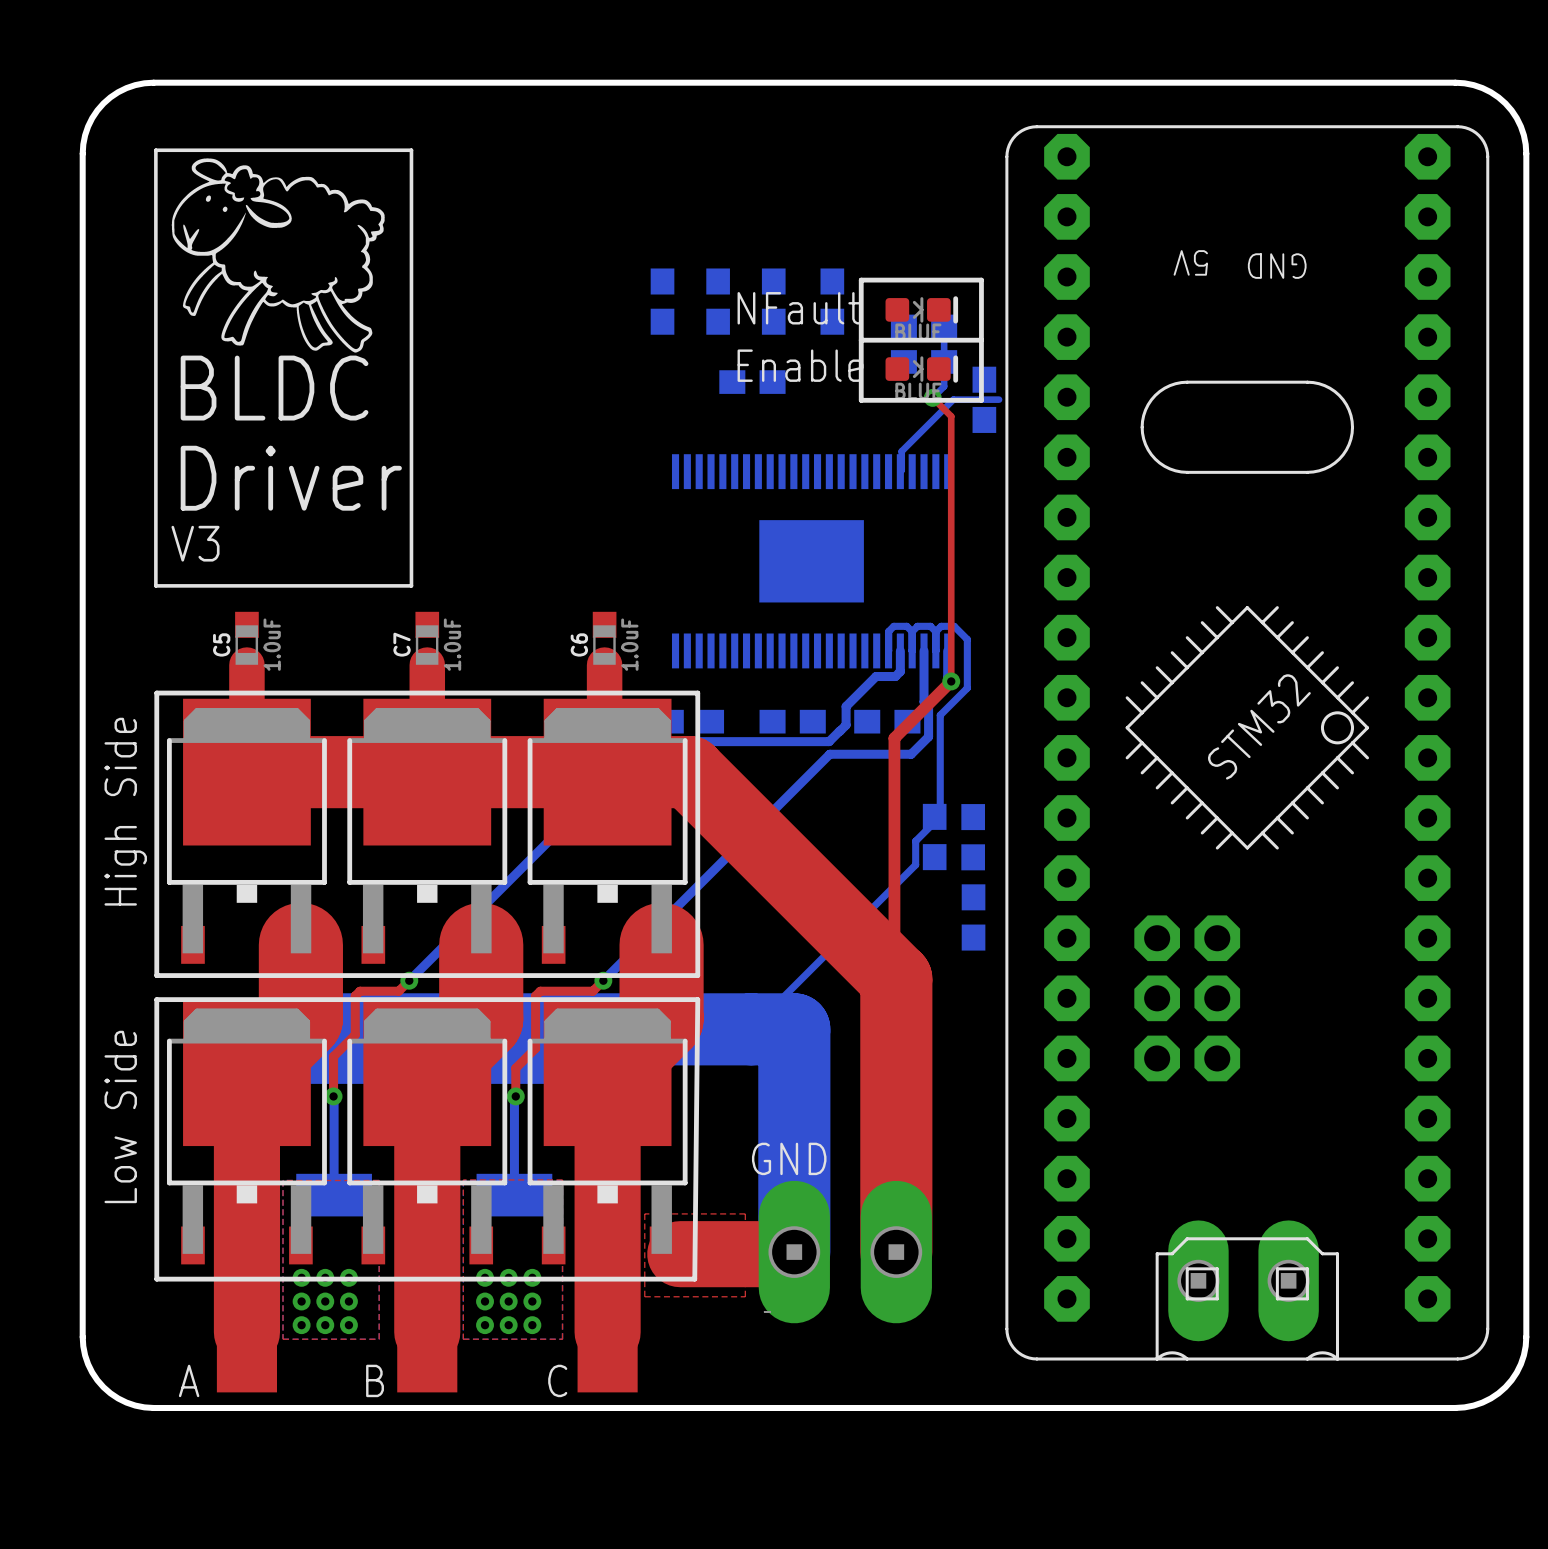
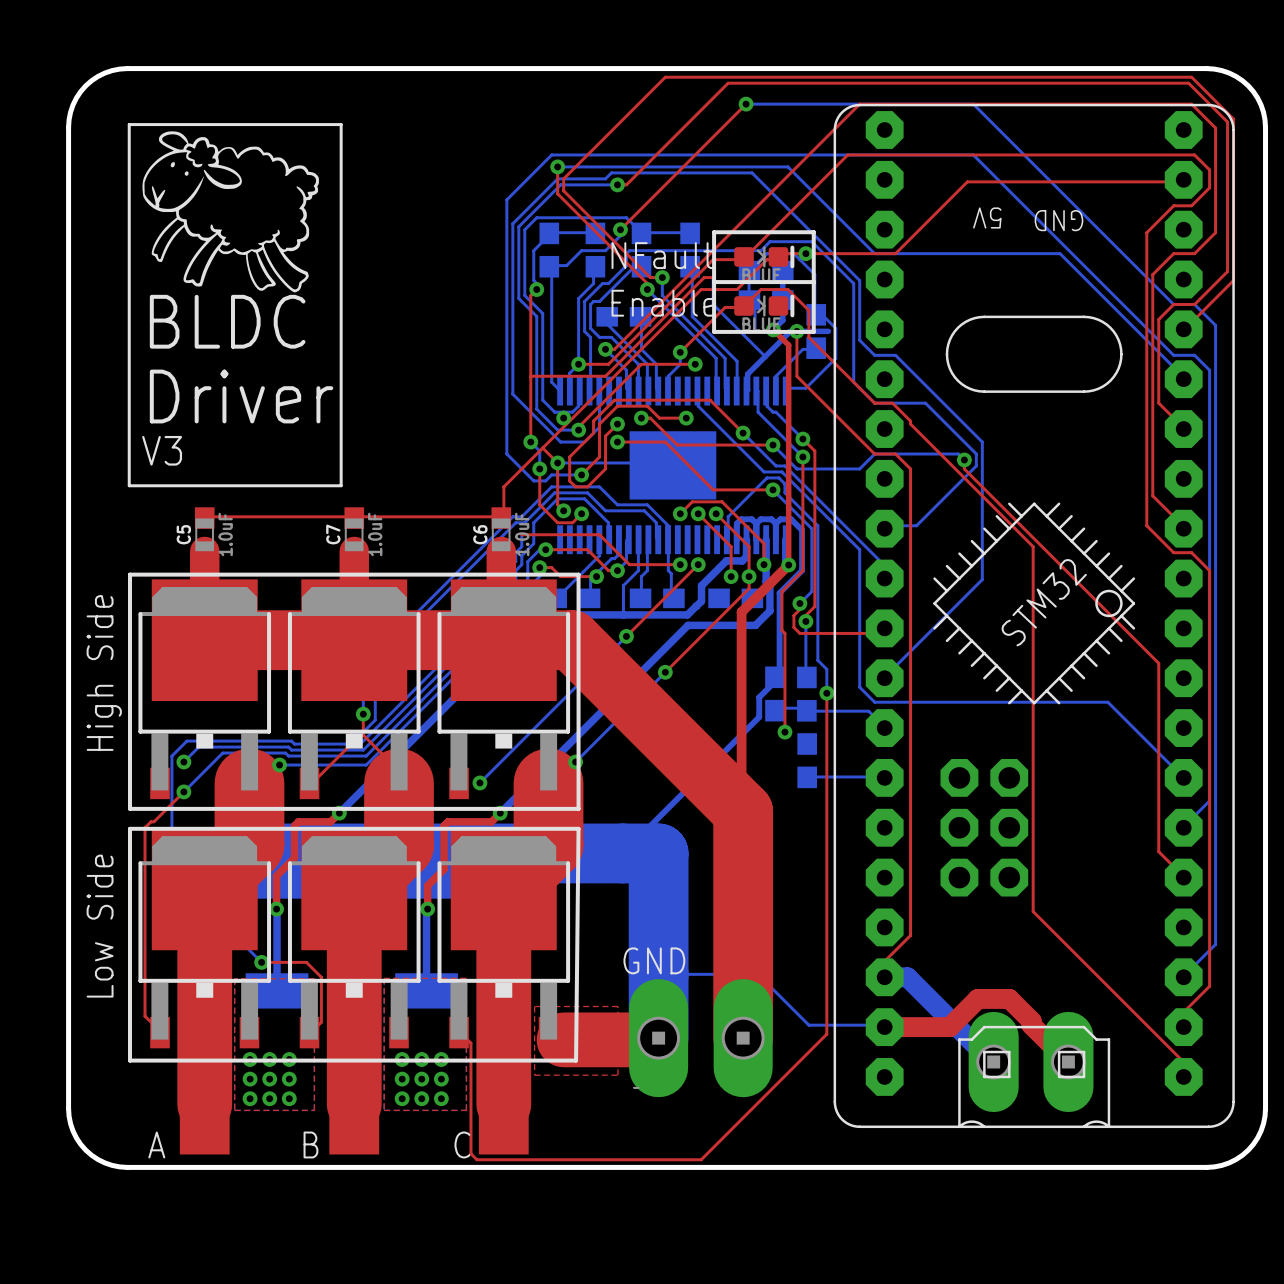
bottom track: none -> (746, 104) (973, 104) (1173, 304) (1194, 304) (1215, 325) (1215, 944) (1183, 977)
top track: none -> (746, 104) (620, 229)
via: none -> (746, 104)
bottom track: none -> (557, 166) (787, 166) (874, 253) (1060, 253) (1183, 379)
top track: none -> (557, 166) (557, 193) (647, 283) (647, 289)
via: none -> (557, 166)
top track: none -> (1183, 179) (1182, 181) (967, 181) (895, 253) (781, 253) (775, 259) (767, 259) (737, 289) (701, 289) (503, 486) (503, 516) (501, 518) (204, 518)
bottom track: none -> (617, 184) (560, 184) (518, 226) (518, 298) (536, 316) (536, 409) (557, 430) (578, 430)
top track: none -> (617, 184) (626, 184) (728, 83) (1188, 83) (1227, 122) (1227, 271) (1194, 304) (1173, 304) (1158, 319) (1158, 403) (1183, 429)
via: none -> (617, 184)
bottom track: none -> (620, 229) (620, 235) (605, 250) (581, 250) (566, 265) (549, 266) (551, 268) (551, 382) (560, 391)
via: none -> (620, 229)
bottom track: none -> (595, 233) (549, 233) (533, 250) (533, 280) (536, 283) (536, 289)
bottom track: none -> (690, 233) (641, 233) (626, 217) (536, 217) (524, 229) (524, 295) (542, 313) (542, 400) (554, 412) (572, 412) (578, 406) (579, 391)
via: none -> (805, 253)
bottom track: none -> (595, 266) (593, 268) (593, 283) (578, 298) (578, 364) (569, 373) (569, 391)
bottom track: none -> (641, 266) (641, 268) (632, 268) (599, 301) (593, 301) (590, 304) (590, 328) (599, 337) (611, 337) (638, 364) (638, 391)
bottom track: none -> (690, 266) (692, 268) (692, 316) (737, 361) (736, 391)
bottom track: none -> (662, 277) (662, 295) (725, 358) (725, 388) (726, 391)
top track: none -> (662, 277) (650, 277) (563, 190) (563, 178) (665, 77) (1191, 77) (1233, 119) (1233, 280) (1183, 329)
via: none -> (662, 277)
bottom track: none -> (713, 277) (713, 304) (765, 356)
top track: none -> (713, 277) (704, 277) (605, 376) (530, 376)
top track: none -> (536, 289) (530, 295) (530, 442)
via: none -> (536, 289)
bottom track: none -> (647, 289) (716, 358) (717, 391)
via: none -> (647, 289)
bottom track: none -> (607, 316) (608, 325) (647, 364) (648, 391)
bottom track: none -> (640, 316) (641, 349) (656, 364) (656, 388) (658, 391)
bottom track: none -> (755, 328) (755, 304) (749, 298) (749, 270) (767, 253) (793, 253) (814, 274) (814, 313) (817, 316) (823, 316) (835, 328) (835, 358) (805, 388) (787, 388) (785, 391)
top track: none -> (796, 331) (796, 376) (874, 454) (895, 454) (910, 468) (910, 935) (886, 959) (886, 974) (884, 977)
via: none -> (796, 331)
bottom track: none -> (816, 348) (802, 349) (775, 376) (775, 391)
bottom track: none -> (605, 349) (626, 370) (626, 388) (628, 391)
top track: none -> (605, 349) (614, 349) (859, 104) (1191, 104) (1215, 128) (1215, 232) (1194, 253) (1173, 253) (1152, 274) (1152, 495) (1183, 528)
via: none -> (605, 349)
bottom track: none -> (680, 352) (680, 364) (668, 376) (668, 391)
top track: none -> (680, 352) (725, 307) (743, 307) (761, 289) (787, 289) (808, 310) (808, 337) (874, 403) (892, 403) (910, 421) (910, 424) (1033, 546) (1033, 911) (1182, 1061) (1183, 1076)
via: none -> (680, 352)
top track: none -> (578, 364) (608, 364) (713, 259) (743, 259) (847, 154) (1194, 154) (1209, 169) (1209, 187) (1191, 205) (1173, 205) (1146, 232) (1146, 525) (1173, 552) (1191, 552) (1209, 570) (1209, 986) (1185, 1010) (1185, 1025) (1183, 1027)
via: none -> (578, 364)
top track: none -> (695, 364) (641, 364) (578, 427) (578, 430)
via: none -> (695, 364)
bottom track: none -> (589, 391) (590, 337) (584, 331) (584, 301) (602, 283) (608, 283) (626, 265) (626, 253) (629, 250) (761, 250) (770, 241) (811, 241) (853, 283) (853, 382) (874, 403) (925, 403) (976, 454) (976, 465) (916, 525) (886, 525) (884, 528)
bottom track: none -> (599, 391) (599, 427) (584, 442) (560, 442) (512, 394) (512, 223) (557, 178) (605, 178) (611, 172) (752, 172) (859, 280) (859, 340) (874, 355) (895, 355) (982, 442) (982, 579) (884, 678)
bottom track: none -> (697, 391) (698, 406) (764, 471) (781, 471) (859, 549) (859, 687) (874, 702) (1107, 702) (1183, 777)
bottom track: none -> (756, 391) (758, 391) (758, 412) (802, 457)
bottom track: none -> (766, 391) (767, 406) (772, 412) (775, 412) (802, 439)
via: none -> (563, 418)
top track: none -> (641, 418) (650, 418) (677, 445) (772, 445)
via: none -> (641, 418)
top track: none -> (686, 418) (659, 418) (647, 406) (617, 406) (599, 424) (599, 457) (581, 474)
via: none -> (686, 418)
top track: none -> (617, 424) (605, 436) (605, 468) (587, 486) (575, 486) (569, 480) (569, 457) (593, 433) (593, 421) (614, 400) (710, 400) (743, 433)
via: none -> (617, 424)
via: none -> (578, 430)
bottom track: none -> (743, 433) (775, 465) (784, 465) (883, 564) (884, 578)
via: none -> (743, 433)
top track: none -> (802, 439) (814, 451) (814, 606) (805, 615) (805, 621)
via: none -> (802, 439)
bottom track: none -> (530, 442) (539, 451) (539, 468)
via: none -> (530, 442)
top track: none -> (617, 442) (665, 442) (713, 489) (772, 489)
via: none -> (617, 442)
bottom track: none -> (772, 445) (796, 468) (859, 468) (874, 454) (958, 454) (964, 459)
via: none -> (772, 445)
top track: none -> (542, 448) (557, 462) (557, 504) (563, 510)
top track: none -> (802, 457) (802, 570) (781, 591) (781, 630) (784, 633) (784, 732)
via: none -> (802, 457)
top track: none -> (964, 459) (964, 468) (1158, 663) (1158, 851) (1183, 877)
via: none -> (964, 459)
bottom track: none -> (557, 462) (671, 462) (672, 465)
via: none -> (557, 462)
top track: none -> (539, 468) (539, 504) (557, 522) (572, 522) (581, 513)
via: none -> (539, 468)
bottom track: none -> (581, 474) (551, 474) (545, 480) (533, 480) (506, 454) (506, 199) (551, 154) (973, 154) (1173, 355) (1194, 355) (1209, 370) (1209, 800) (1183, 827)
via: none -> (581, 474)
bottom track: none -> (772, 489) (811, 528) (811, 591) (799, 603)
via: none -> (772, 489)
via: none -> (563, 510)
via: none -> (581, 513)
top track: none -> (680, 513) (692, 501) (722, 501) (764, 543) (764, 564)
via: none -> (680, 513)
top track: none -> (698, 513) (731, 546) (731, 576)
via: none -> (698, 513)
top track: none -> (716, 513) (749, 546) (749, 588) (665, 672)
via: none -> (716, 513)
bottom track: none -> (521, 534) (521, 546) (515, 552) (515, 561) (509, 567) (509, 594) (360, 744) (294, 744) (291, 741) (186, 741) (171, 756) (171, 917) (192, 938) (237, 938) (261, 962)
top track: none -> (521, 534) (599, 534) (629, 564) (680, 564)
bottom track: none -> (599, 539) (599, 555) (556, 598)
bottom track: none -> (609, 539) (608, 522) (584, 498) (557, 498) (533, 522) (533, 543) (521, 555) (521, 564) (515, 570) (515, 597) (363, 750) (291, 750) (288, 747) (198, 747) (183, 762)
bottom track: none -> (618, 539) (617, 555) (611, 558) (590, 579) (589, 598)
bottom track: none -> (628, 539) (626, 540) (626, 561) (617, 570)
bottom track: none -> (638, 539) (638, 570) (623, 585) (623, 614)
bottom track: none -> (648, 539) (647, 570) (641, 576) (640, 598)
bottom track: none -> (658, 539) (656, 537) (656, 522) (644, 510) (605, 510) (587, 492) (554, 492) (524, 522) (515, 522) (375, 663) (375, 720) (363, 732) (351, 732)
bottom track: none -> (726, 539) (728, 516) (767, 477) (778, 477) (784, 483) (784, 492) (817, 525) (817, 660) (826, 669) (826, 693)
bottom track: none -> (545, 549) (539, 549) (527, 561) (527, 579) (521, 585) (521, 600) (366, 756) (288, 756) (285, 753) (222, 753) (183, 791)
top track: none -> (545, 549) (587, 549) (608, 570) (617, 570)
via: none -> (545, 549)
via: none -> (680, 564)
top track: none -> (698, 564) (626, 636)
via: none -> (698, 564)
via: none -> (764, 564)
bottom track: none -> (539, 567) (539, 576) (527, 588) (527, 603) (366, 765) (279, 765)
top track: none -> (539, 567) (551, 567) (560, 576) (596, 576)
via: none -> (539, 567)
via: none -> (617, 570)
via: none -> (596, 576)
via: none -> (731, 576)
via: none -> (749, 576)
bottom track: none -> (673, 598) (671, 597) (671, 573) (668, 570) (668, 525) (647, 504) (617, 504) (599, 486) (551, 486) (521, 516) (512, 516) (363, 666) (363, 714)
top track: none -> (799, 603) (799, 609) (793, 615) (793, 627) (799, 633) (880, 633) (884, 628)
via: none -> (799, 603)
bottom track: none -> (805, 621) (806, 677)
via: none -> (805, 621)
bottom track: none -> (626, 636) (479, 782)
via: none -> (626, 636)
bottom track: none -> (665, 672) (575, 762)
via: none -> (665, 672)
top track: none -> (826, 693) (826, 1034) (701, 1159) (476, 1159) (470, 1153) (470, 1043) (459, 1032)
via: none -> (826, 693)
bottom track: none -> (774, 710) (775, 708) (805, 708) (808, 711) (868, 711) (884, 728)
top track: none -> (363, 714) (363, 735) (381, 753) (399, 783)
via: none -> (363, 714)
top track: none -> (351, 732) (351, 744) (312, 782) (309, 783)
via: none -> (784, 732)
via: none -> (183, 762)
via: none -> (575, 762)
via: none -> (279, 765)
bottom track: none -> (807, 777) (884, 777)
via: none -> (479, 782)
top track: none -> (183, 791) (153, 821) (150, 821) (145, 827) (145, 1016) (160, 1032)
via: none -> (183, 791)
top track: none -> (261, 962) (306, 962) (321, 977) (321, 1022) (309, 1032)
via: none -> (261, 962)
bottom track: none -> (658, 974) (758, 974) (808, 1025) (883, 1025) (884, 1027)
bottom track: none -> (884, 977) (907, 977) (993, 1061)
top track: none -> (884, 1027) (949, 1027) (977, 998) (1009, 998) (1031, 1021) (1031, 1025) (1068, 1061) (1066, 1061)

